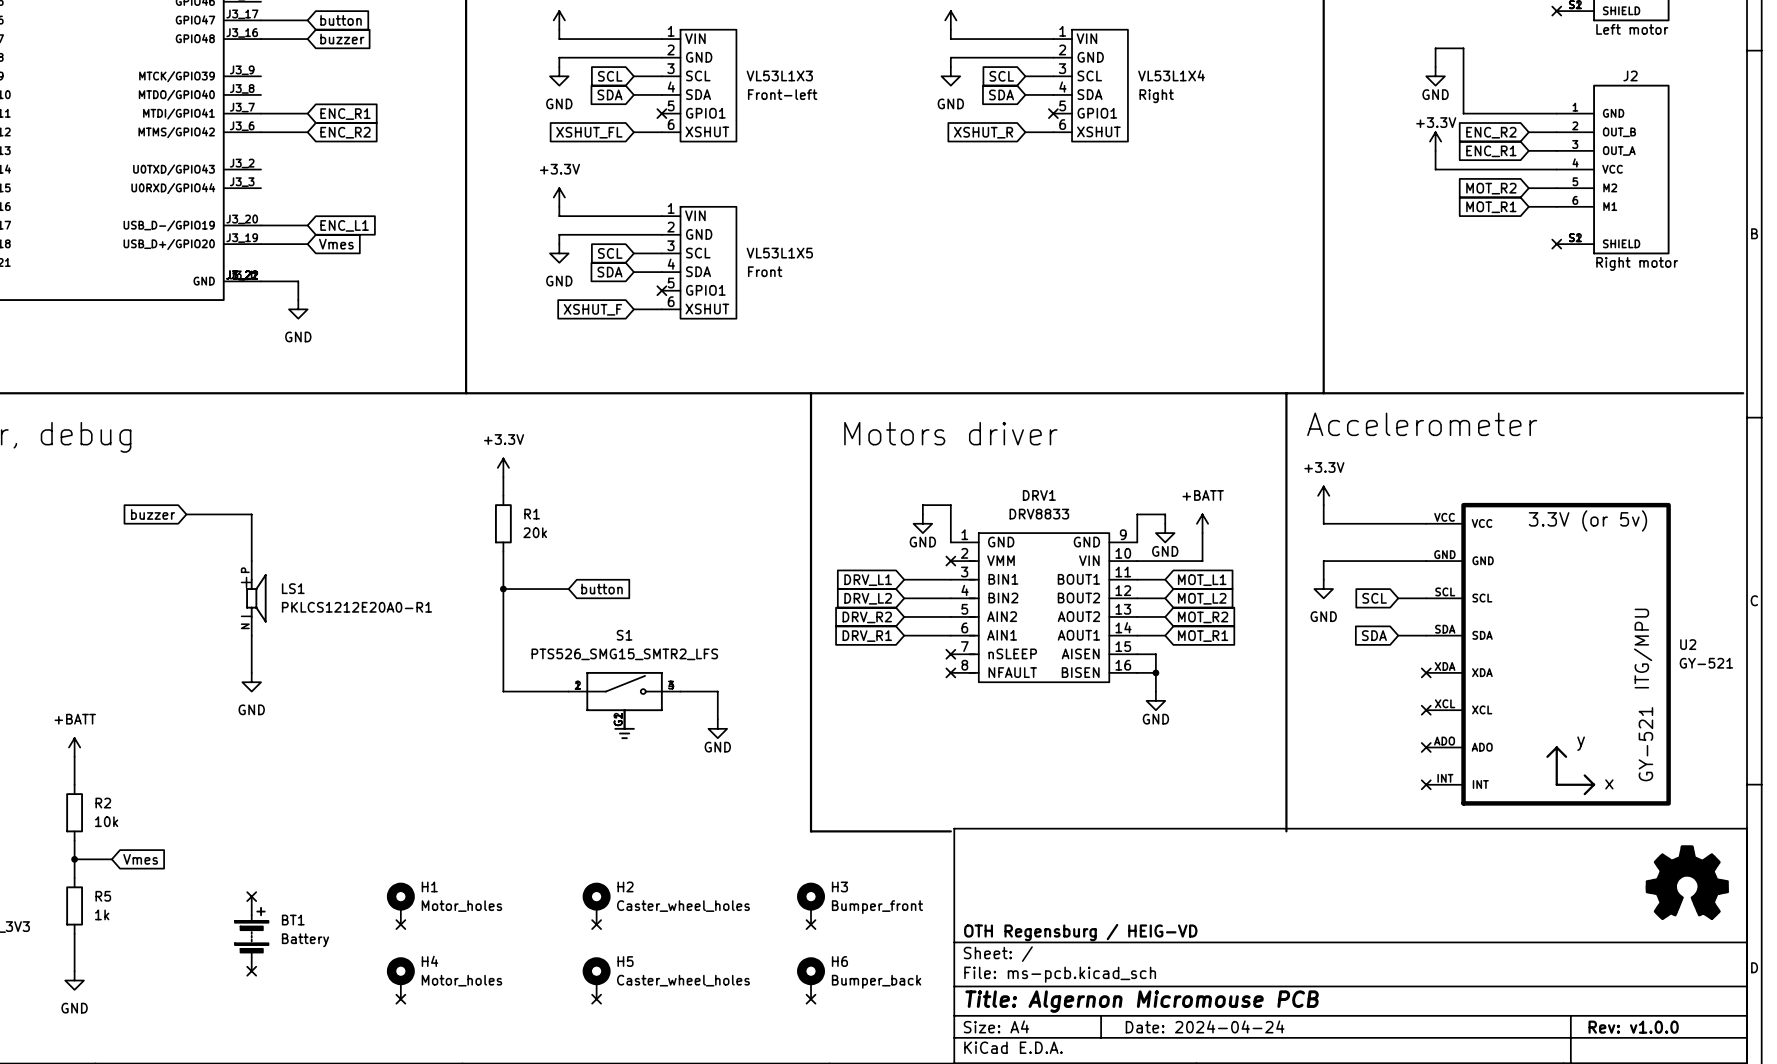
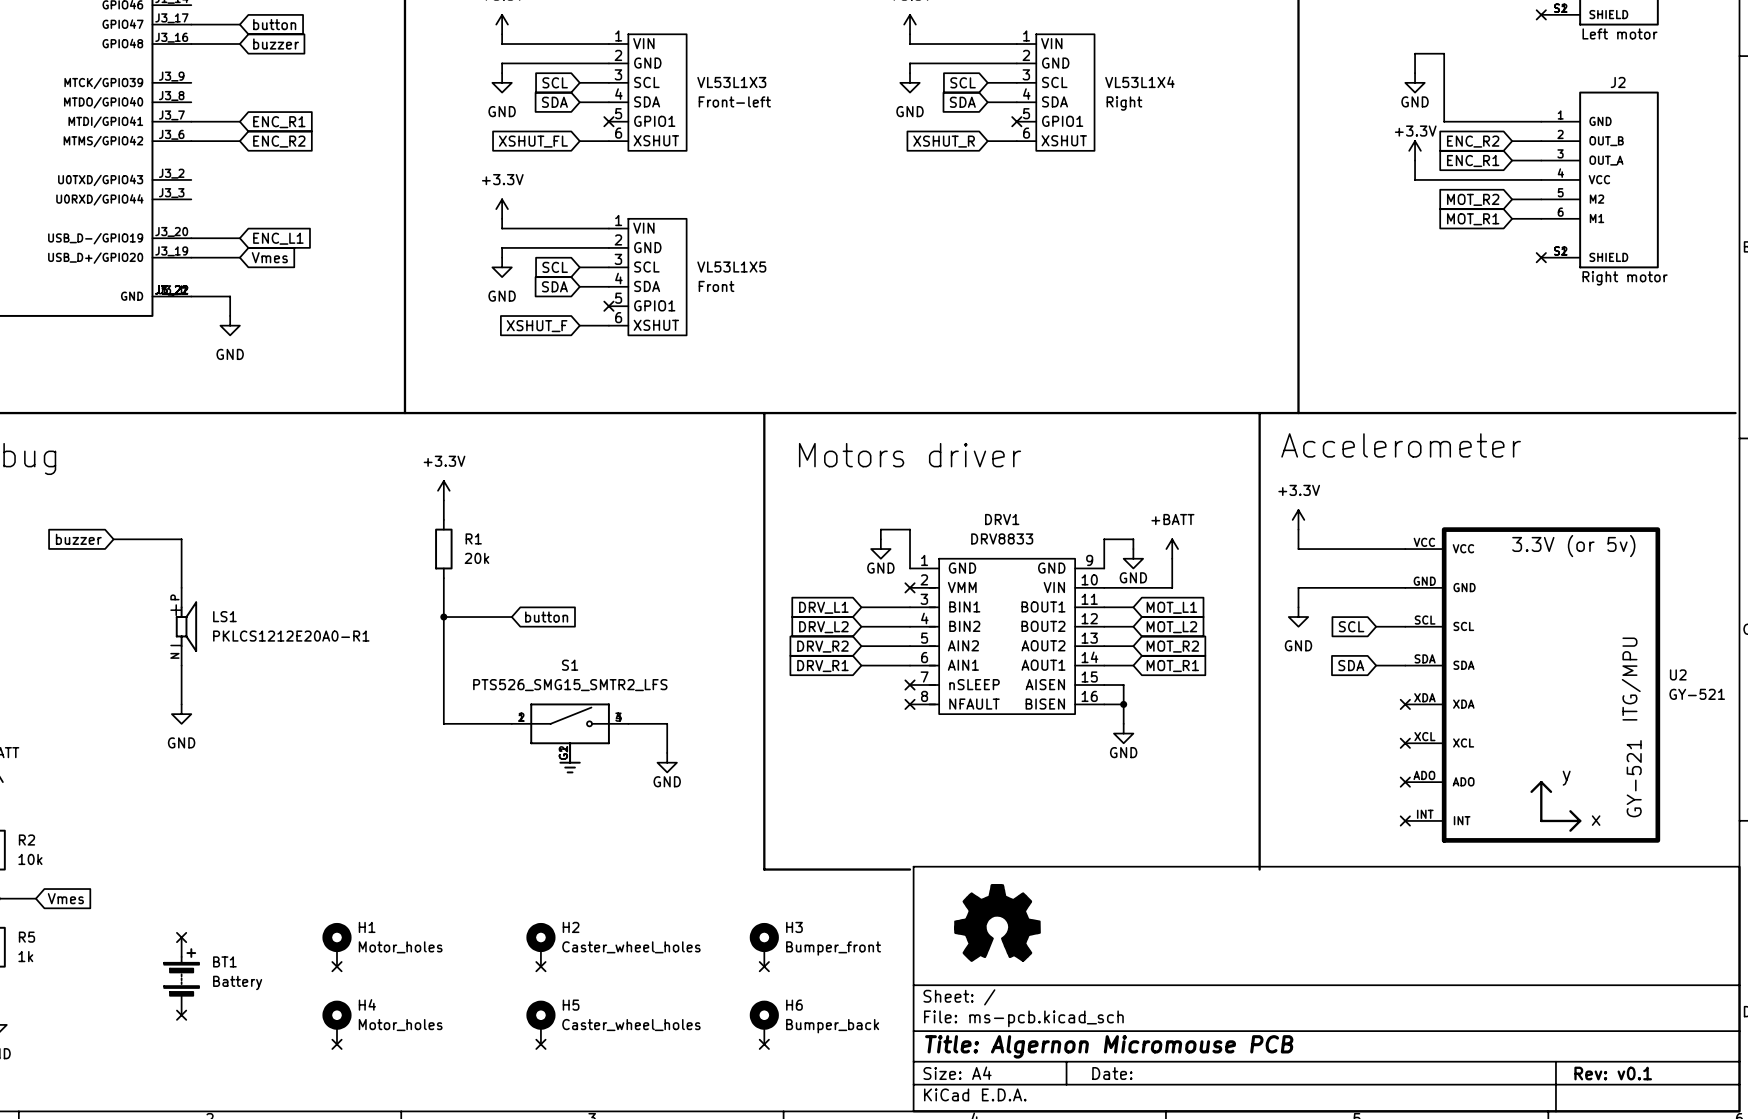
power symbol: none -> (997, 922)
power symbol: (1687, 882) -> none
title block: OTH Regensburg / HEIG-VD (1080, 932) -> none
title block: Date: 2024-04-24 (1205, 1026) -> Date: (1112, 1073)
title block: Rev: v1.0.0 (1633, 1027) -> Rev: v0.1 (1613, 1073)

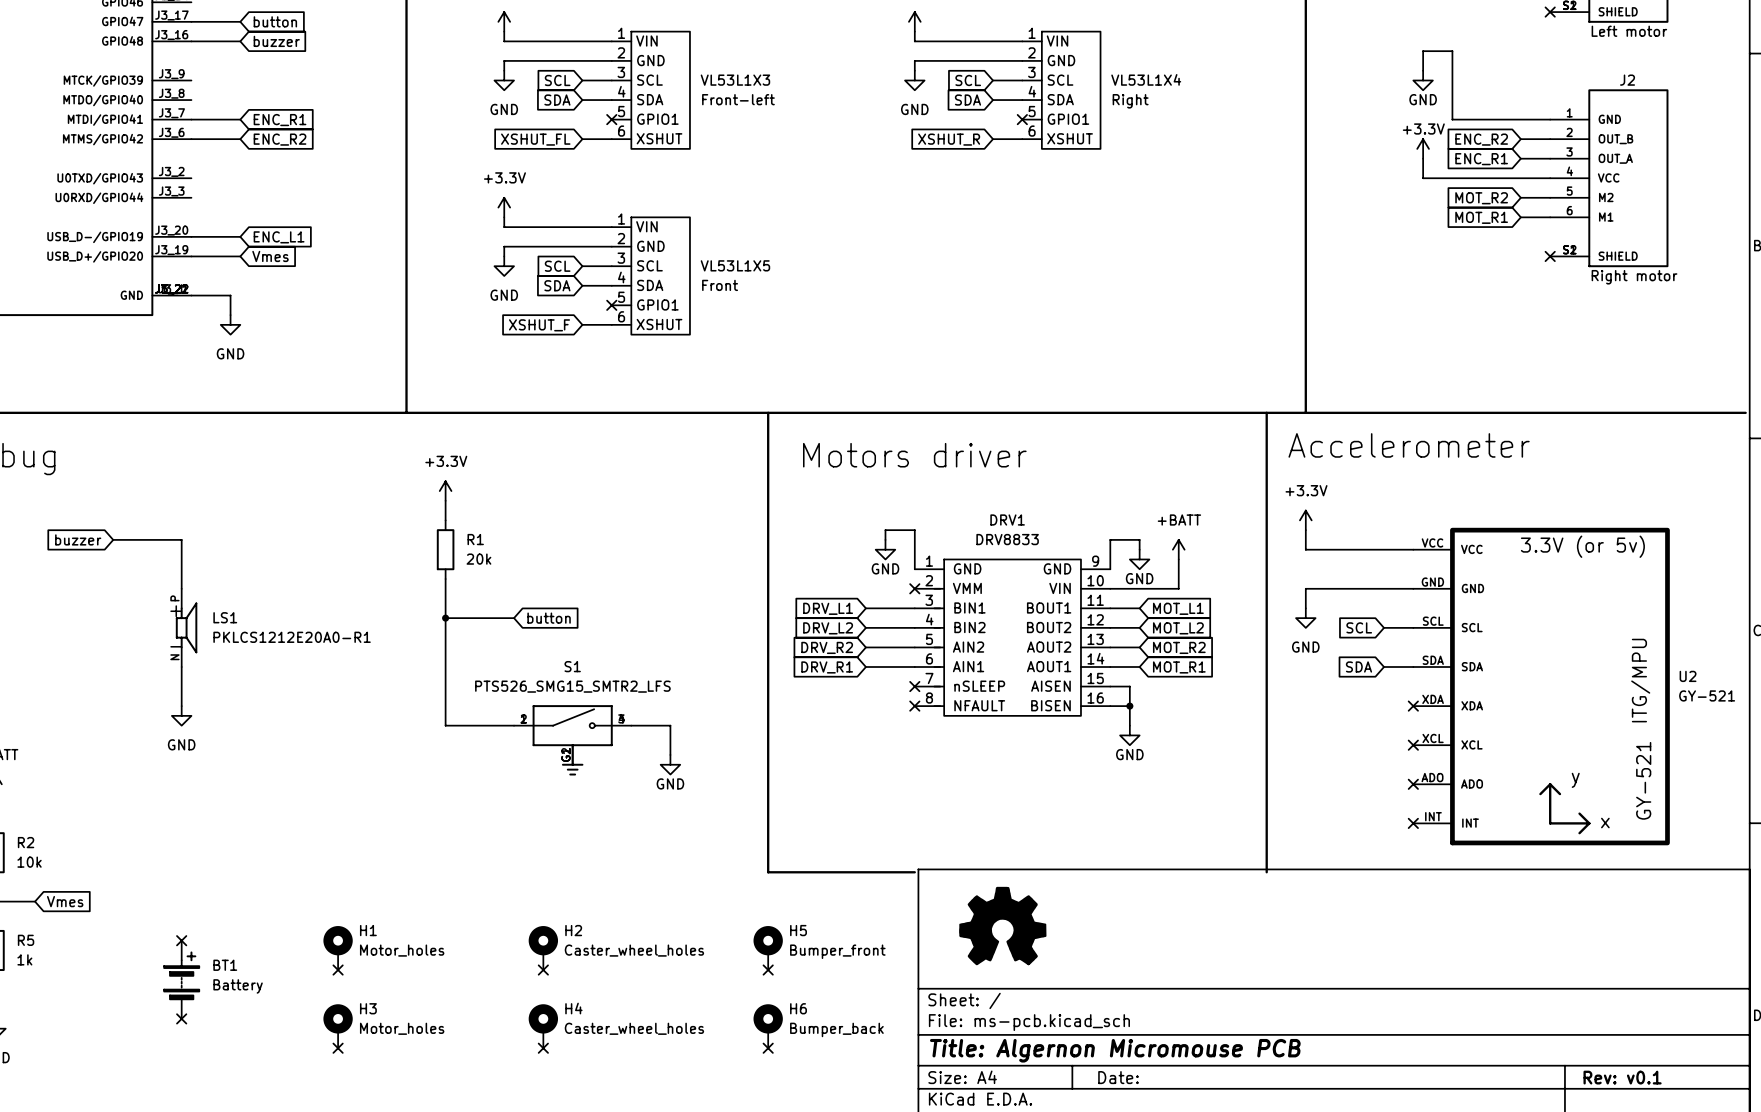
H3 name: H3 (794, 927) -> H5 (798, 930)
H4 name: H4 (367, 1004) -> H3 (368, 1008)
H5 name: H5 (571, 1005) -> H4 (573, 1008)

